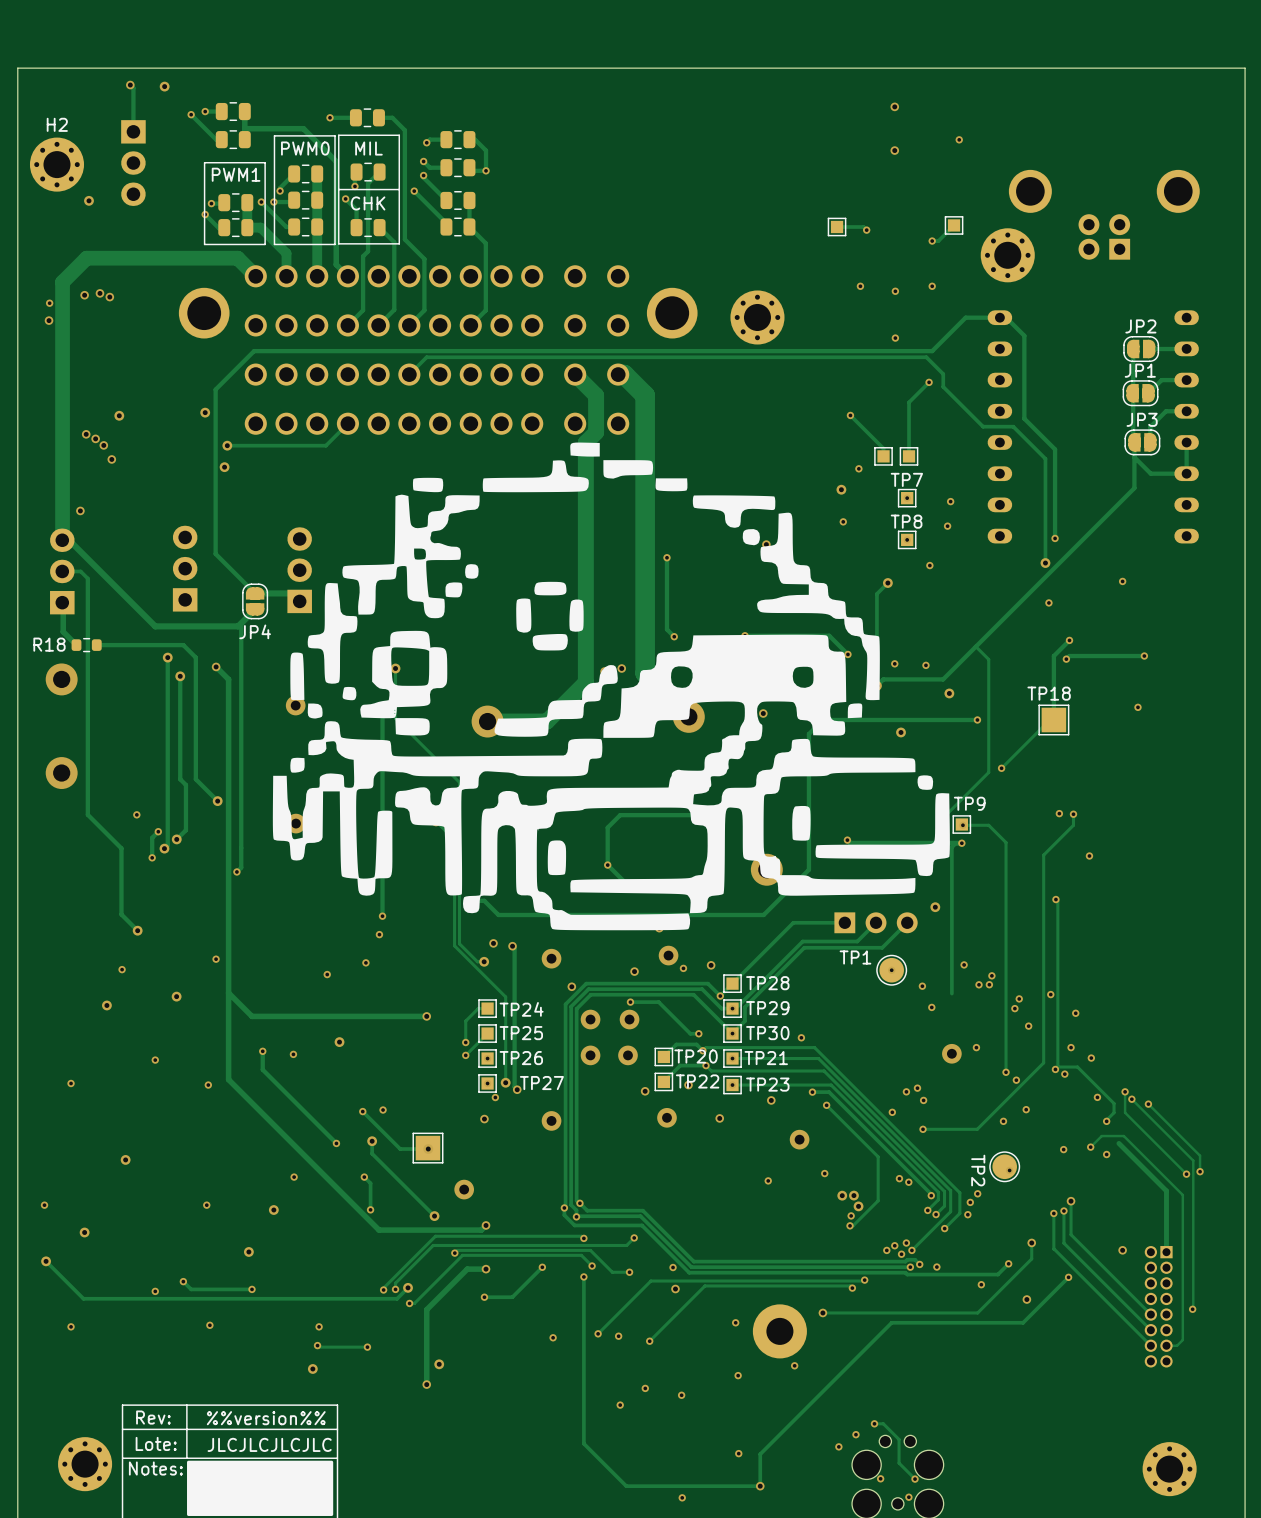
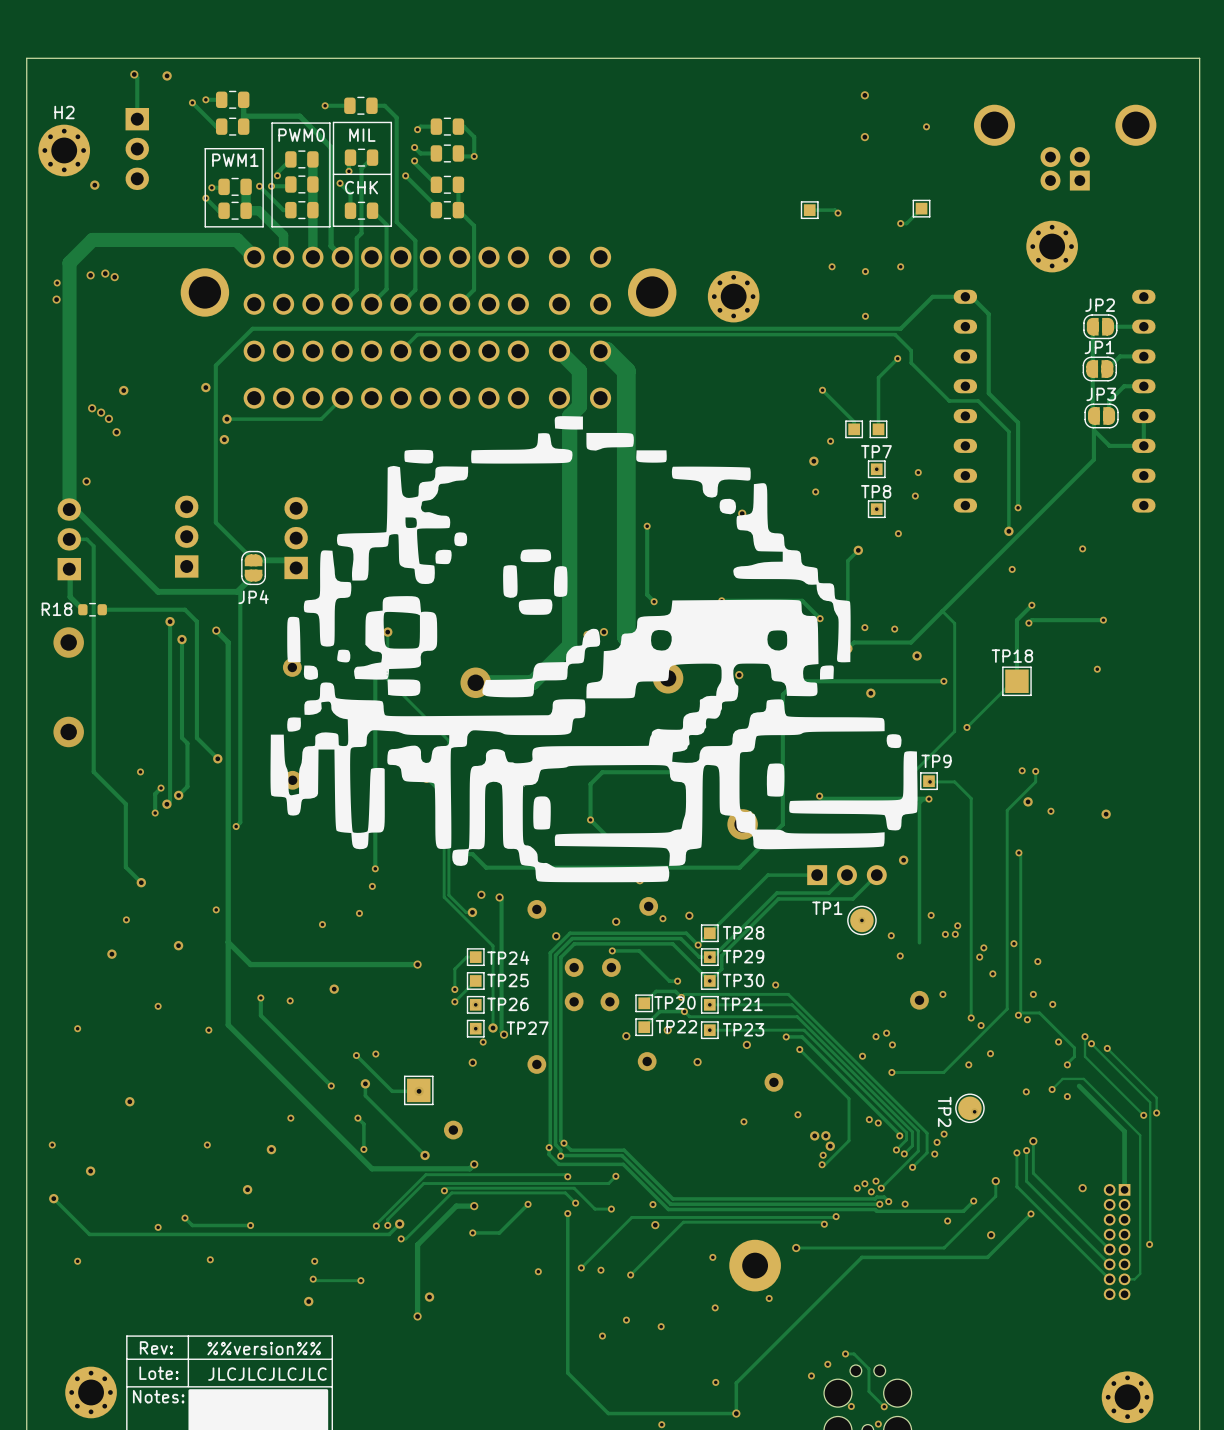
part position: (1104, 214) -> (1065, 147)
part position: (1007, 255) -> (1052, 246)
via: none -> (1028, 801)
via: none -> (1106, 814)

